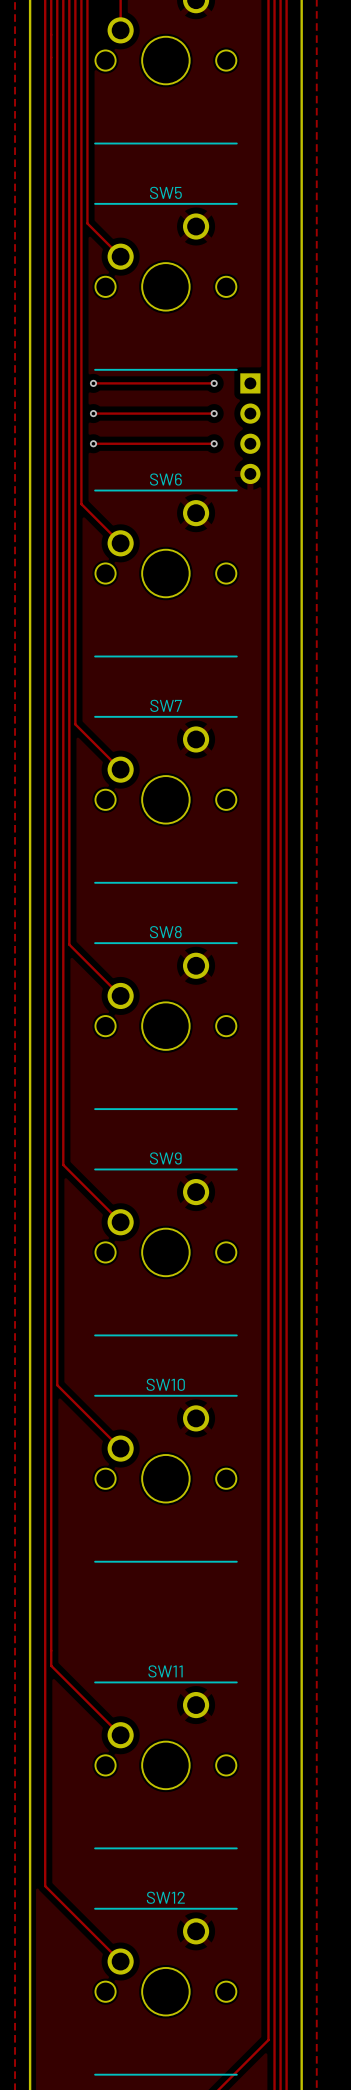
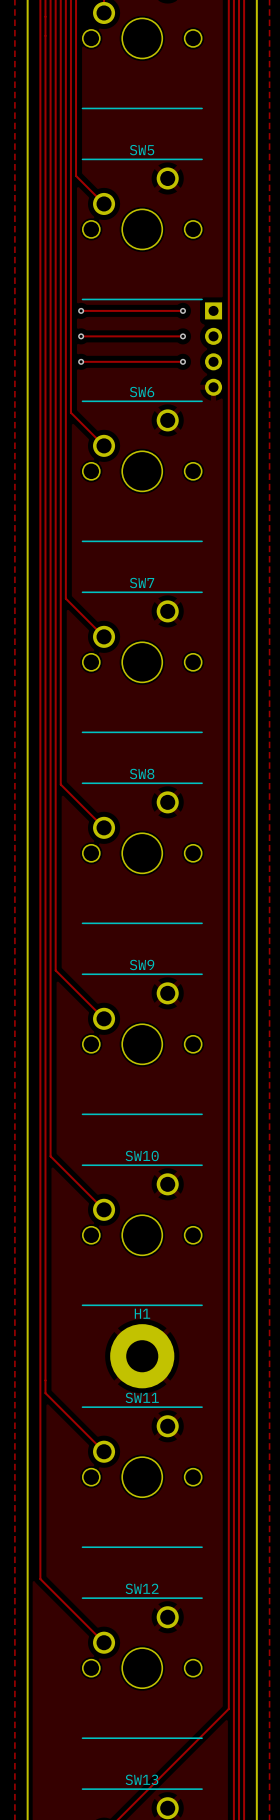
H1: none -> (142, 1356)

